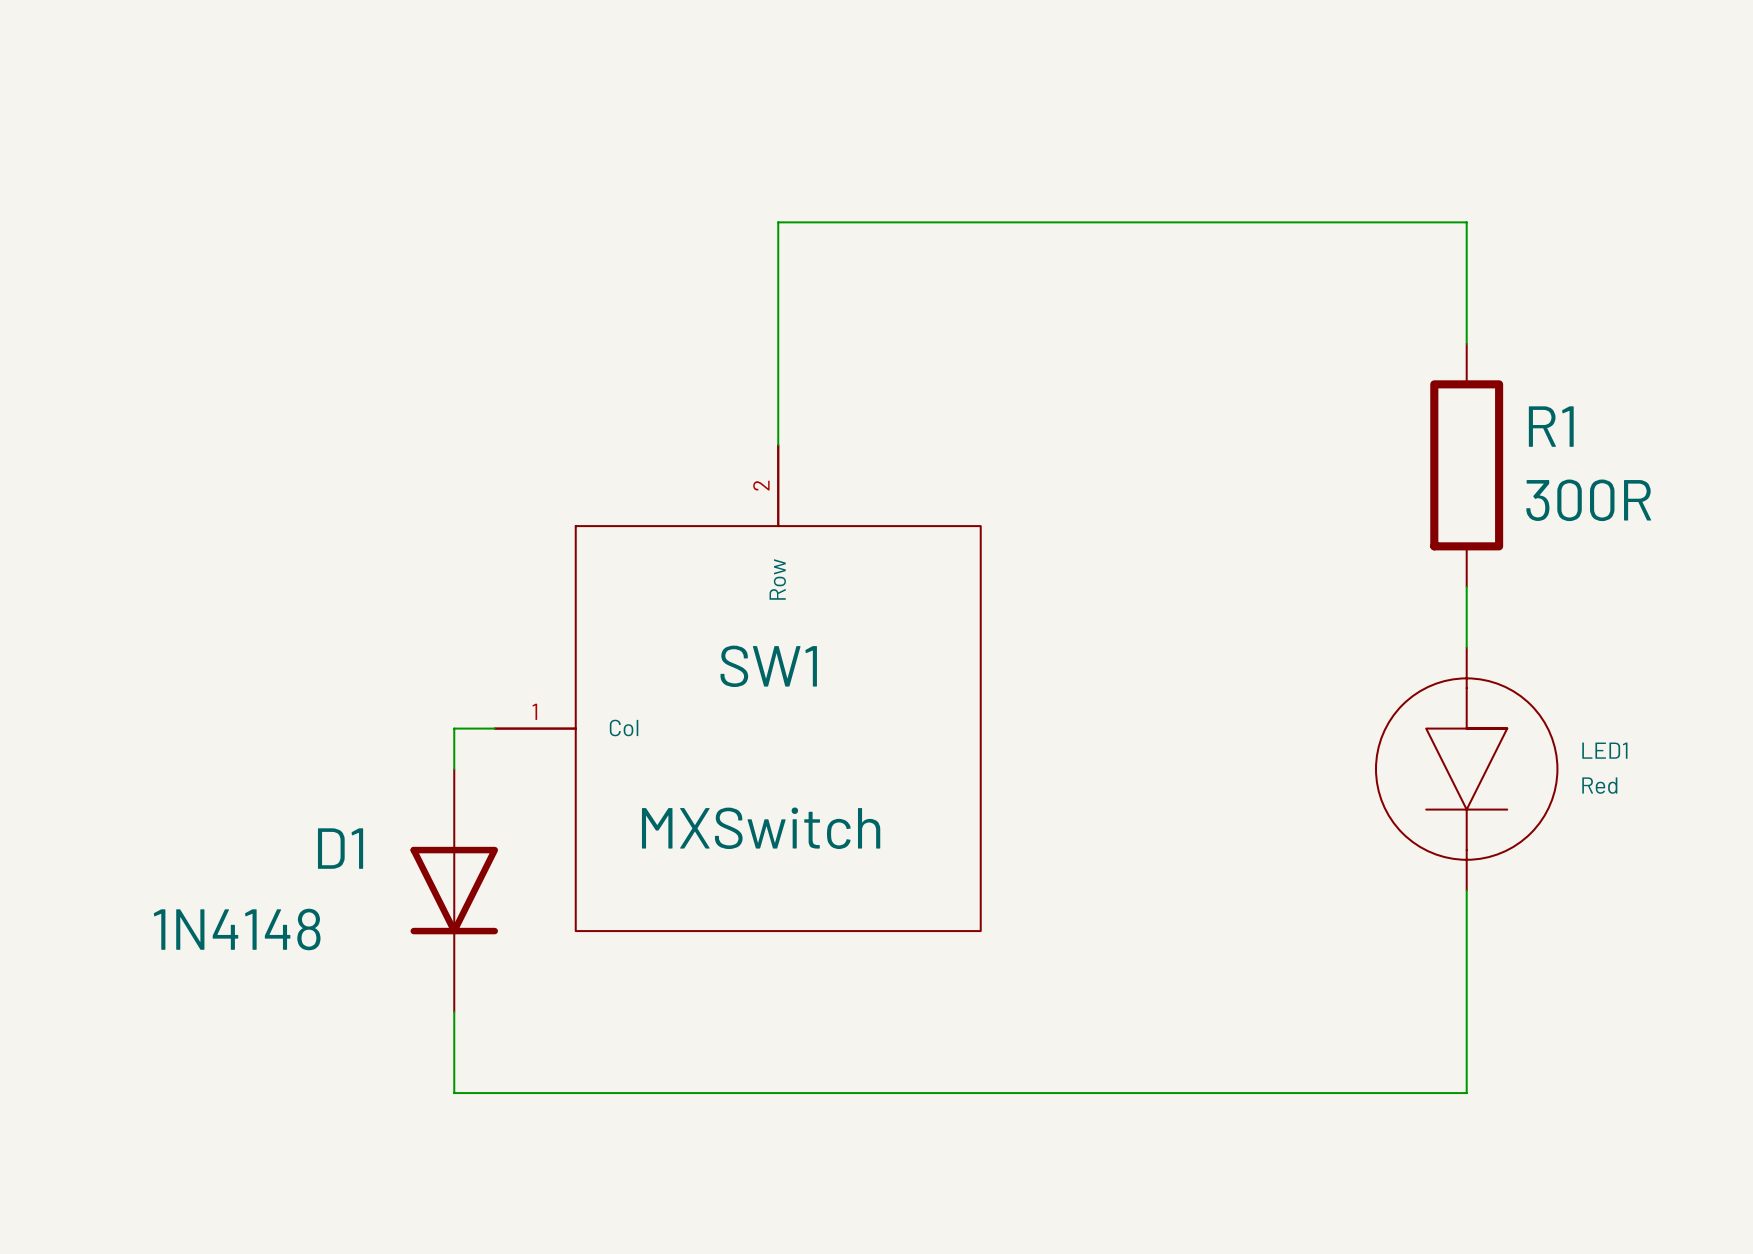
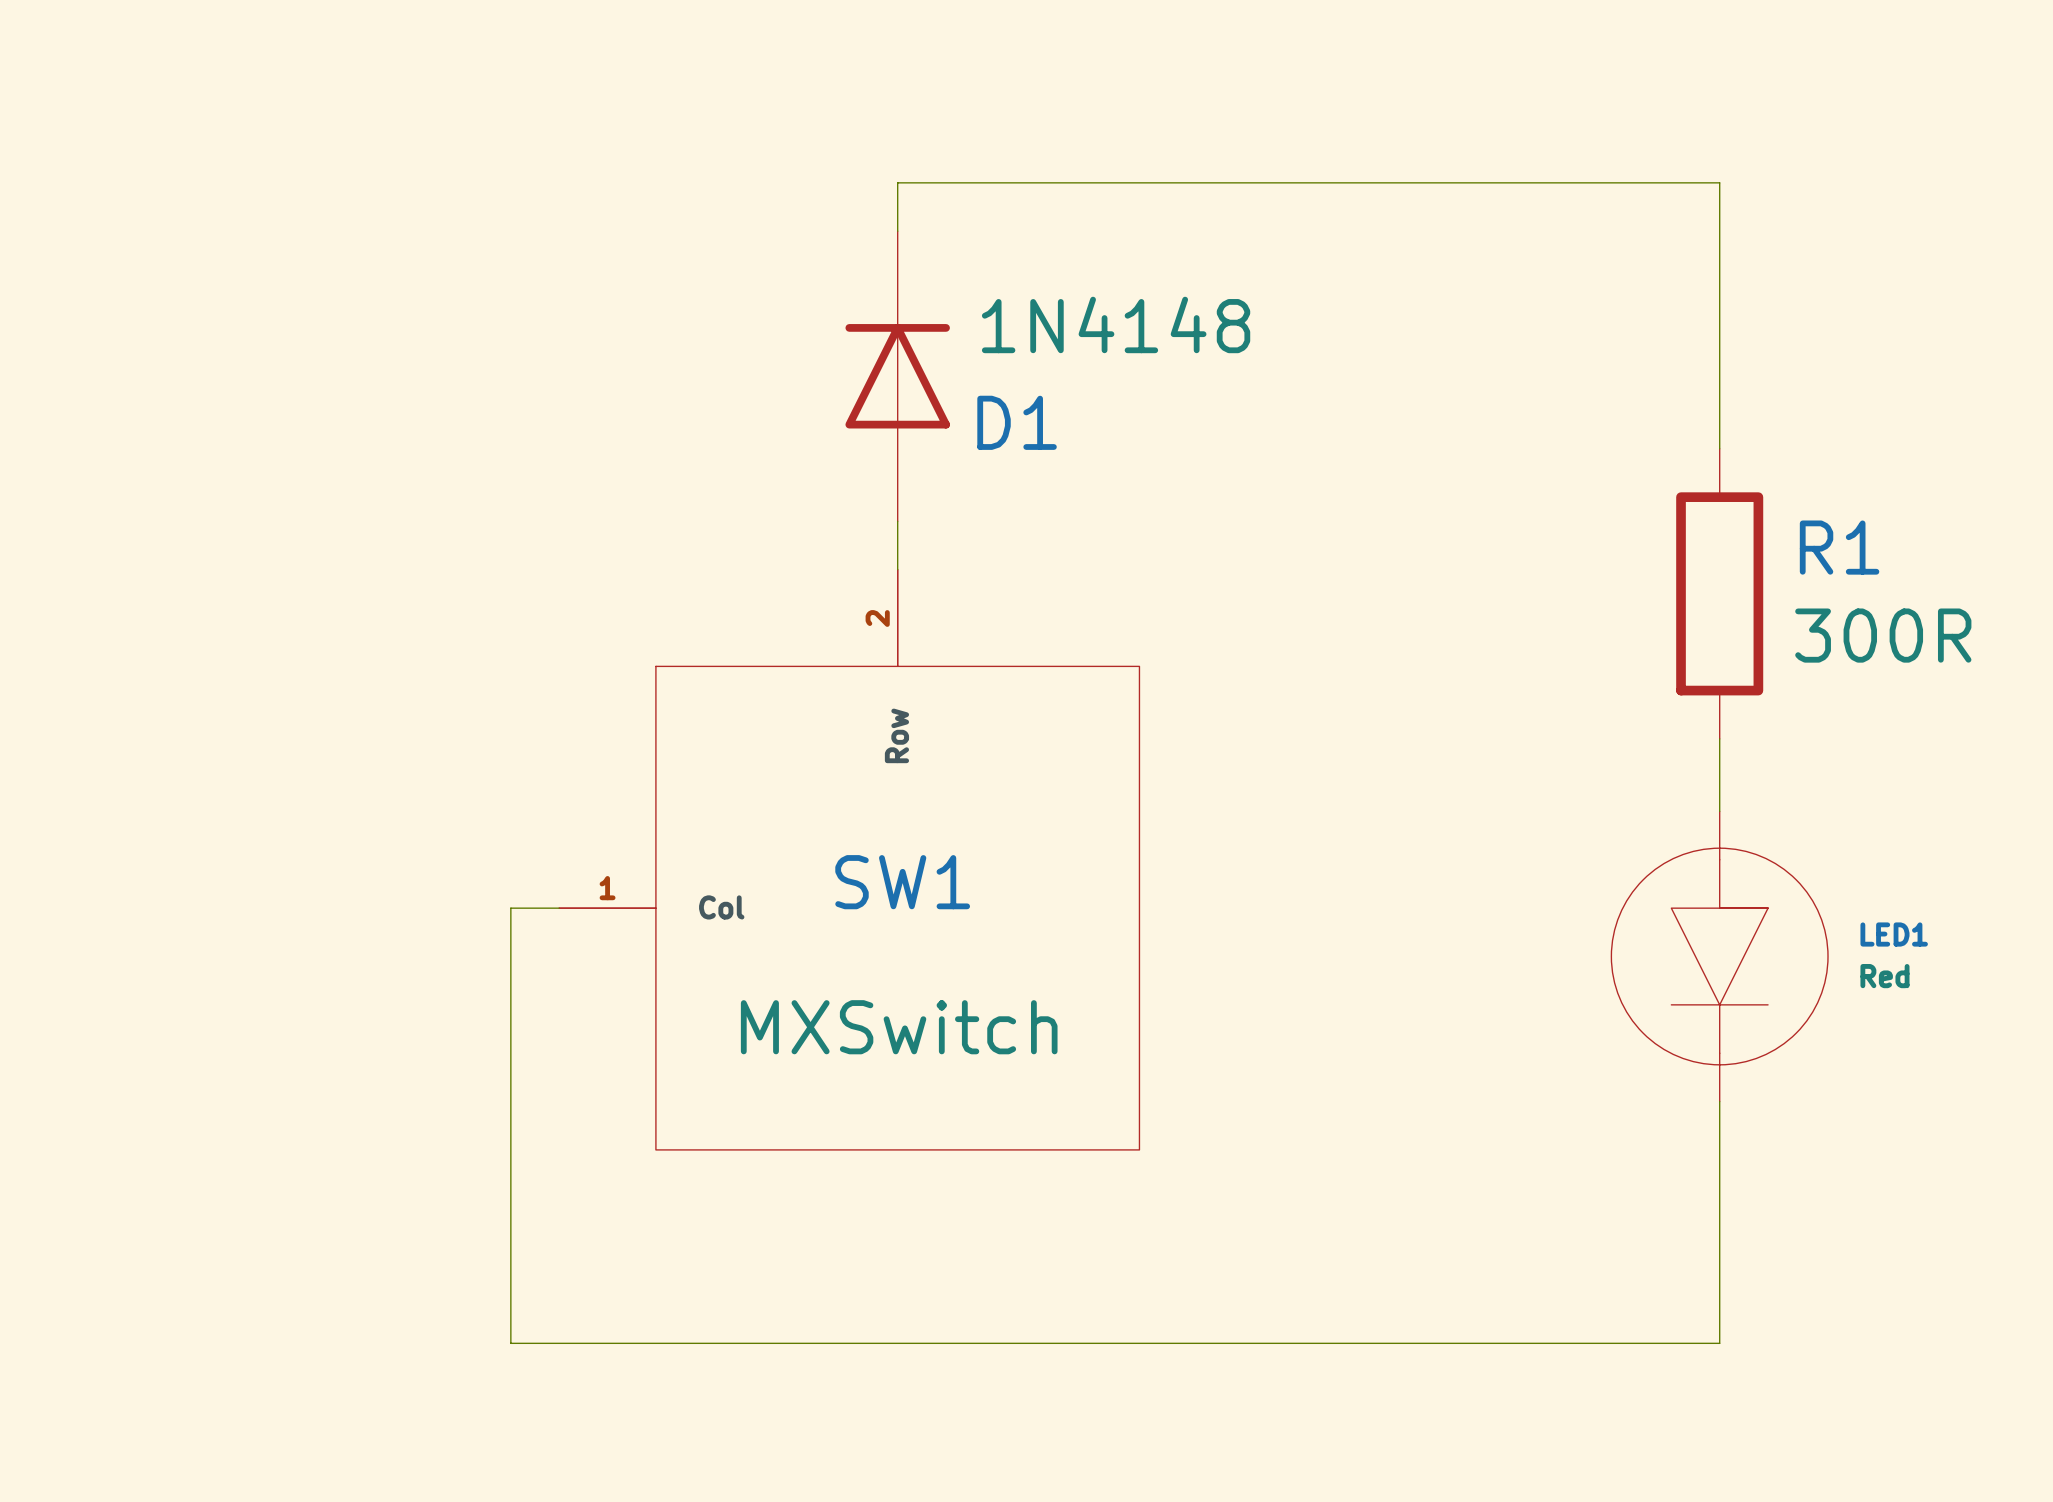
wire: (1466, 222) (778, 222) (778, 404) -> (1719, 303) (1719, 182) (897, 182) (897, 231)
SW1 name position: SW1 (768, 666) -> SW1 (902, 882)
D1 rotation: 0° (454, 890) -> 180° (897, 376)
D1 position: (454, 890) -> (897, 376)

